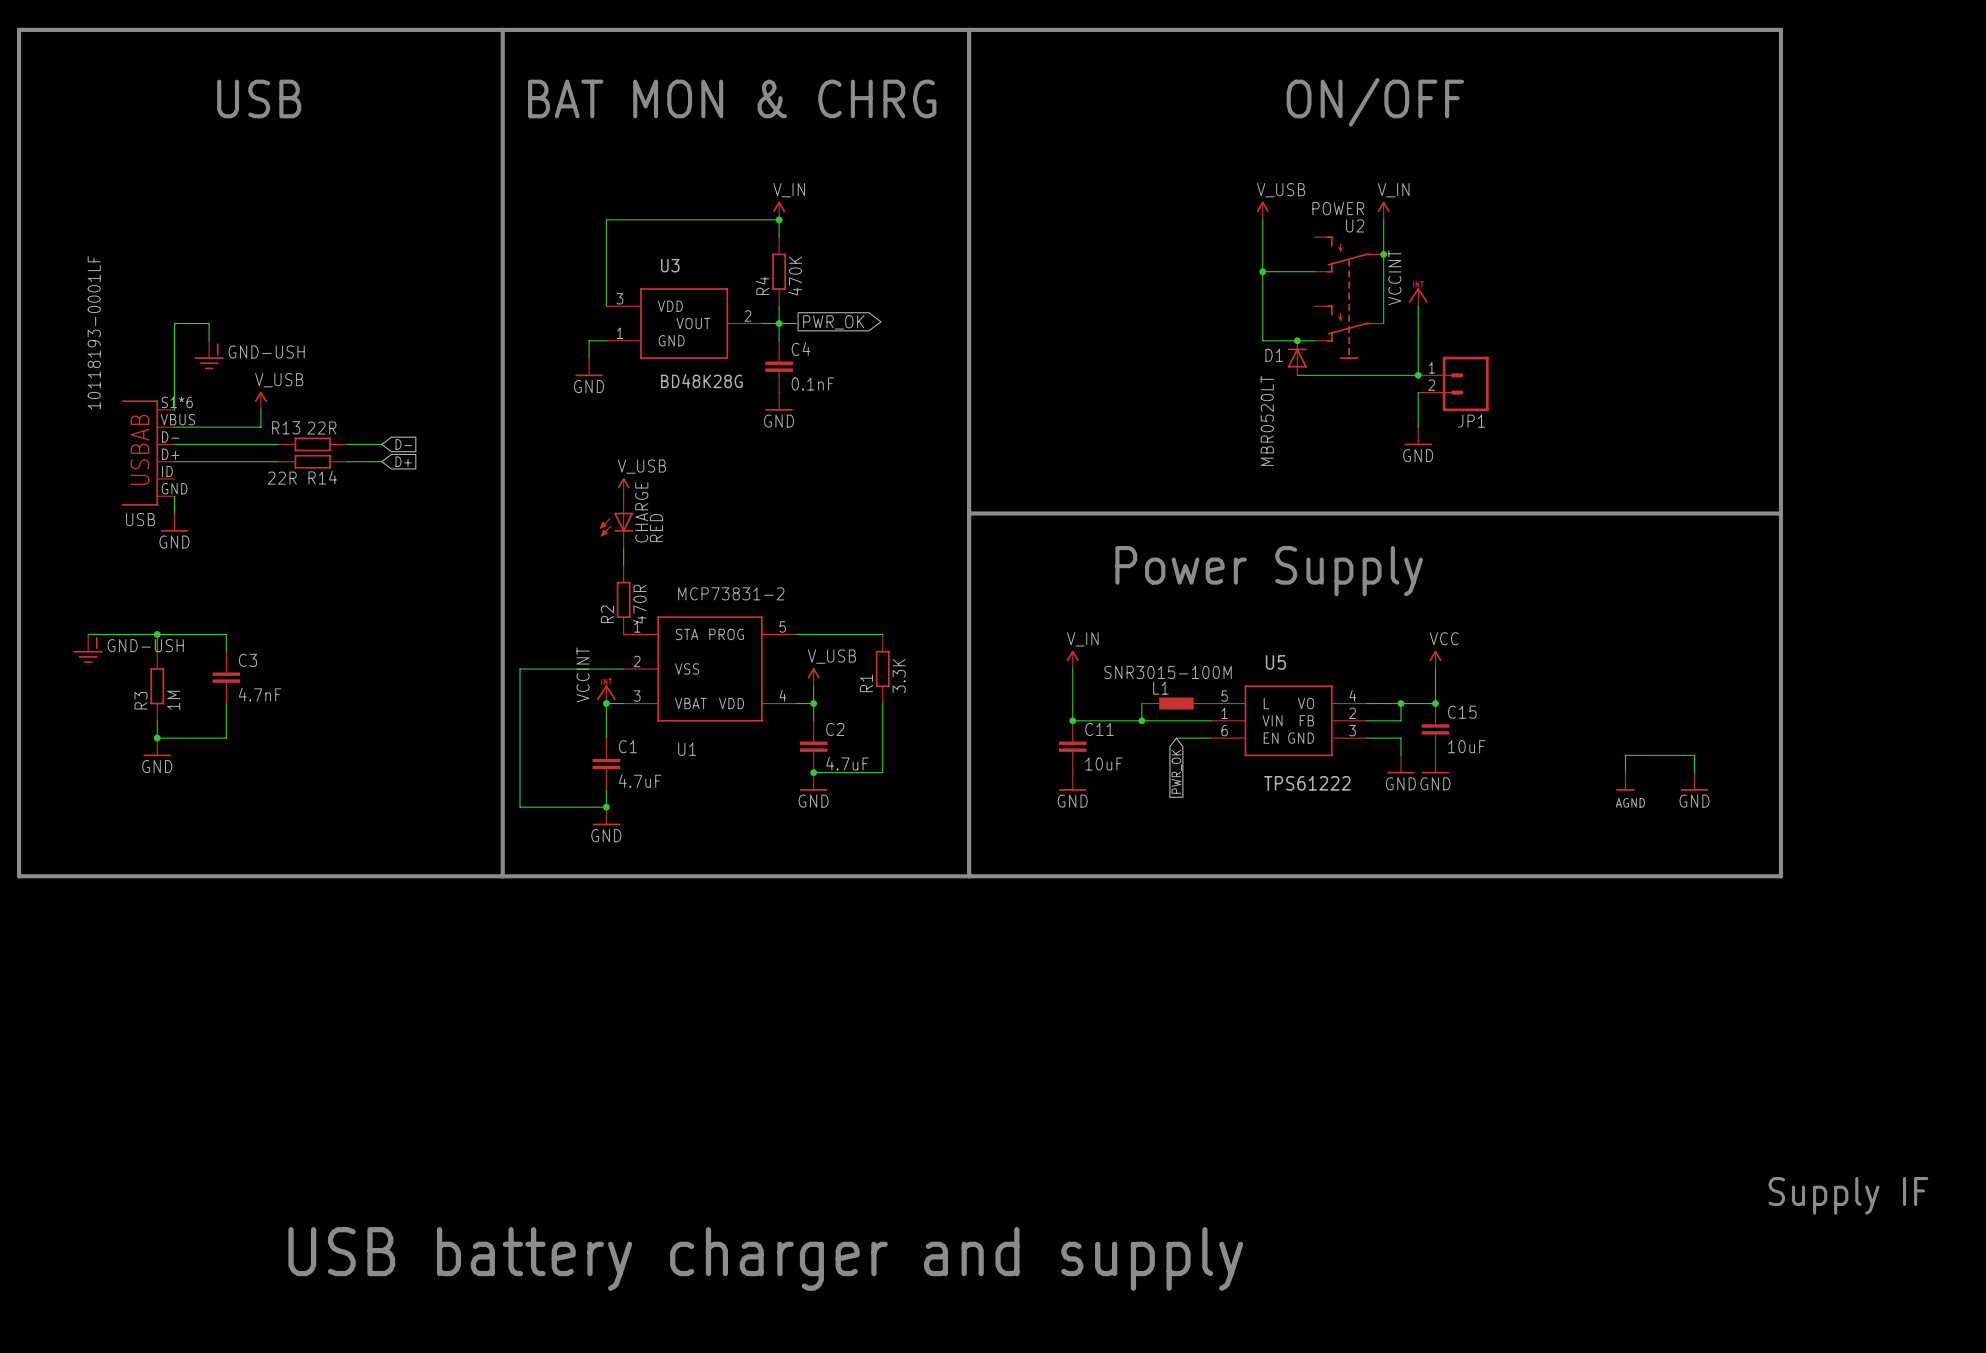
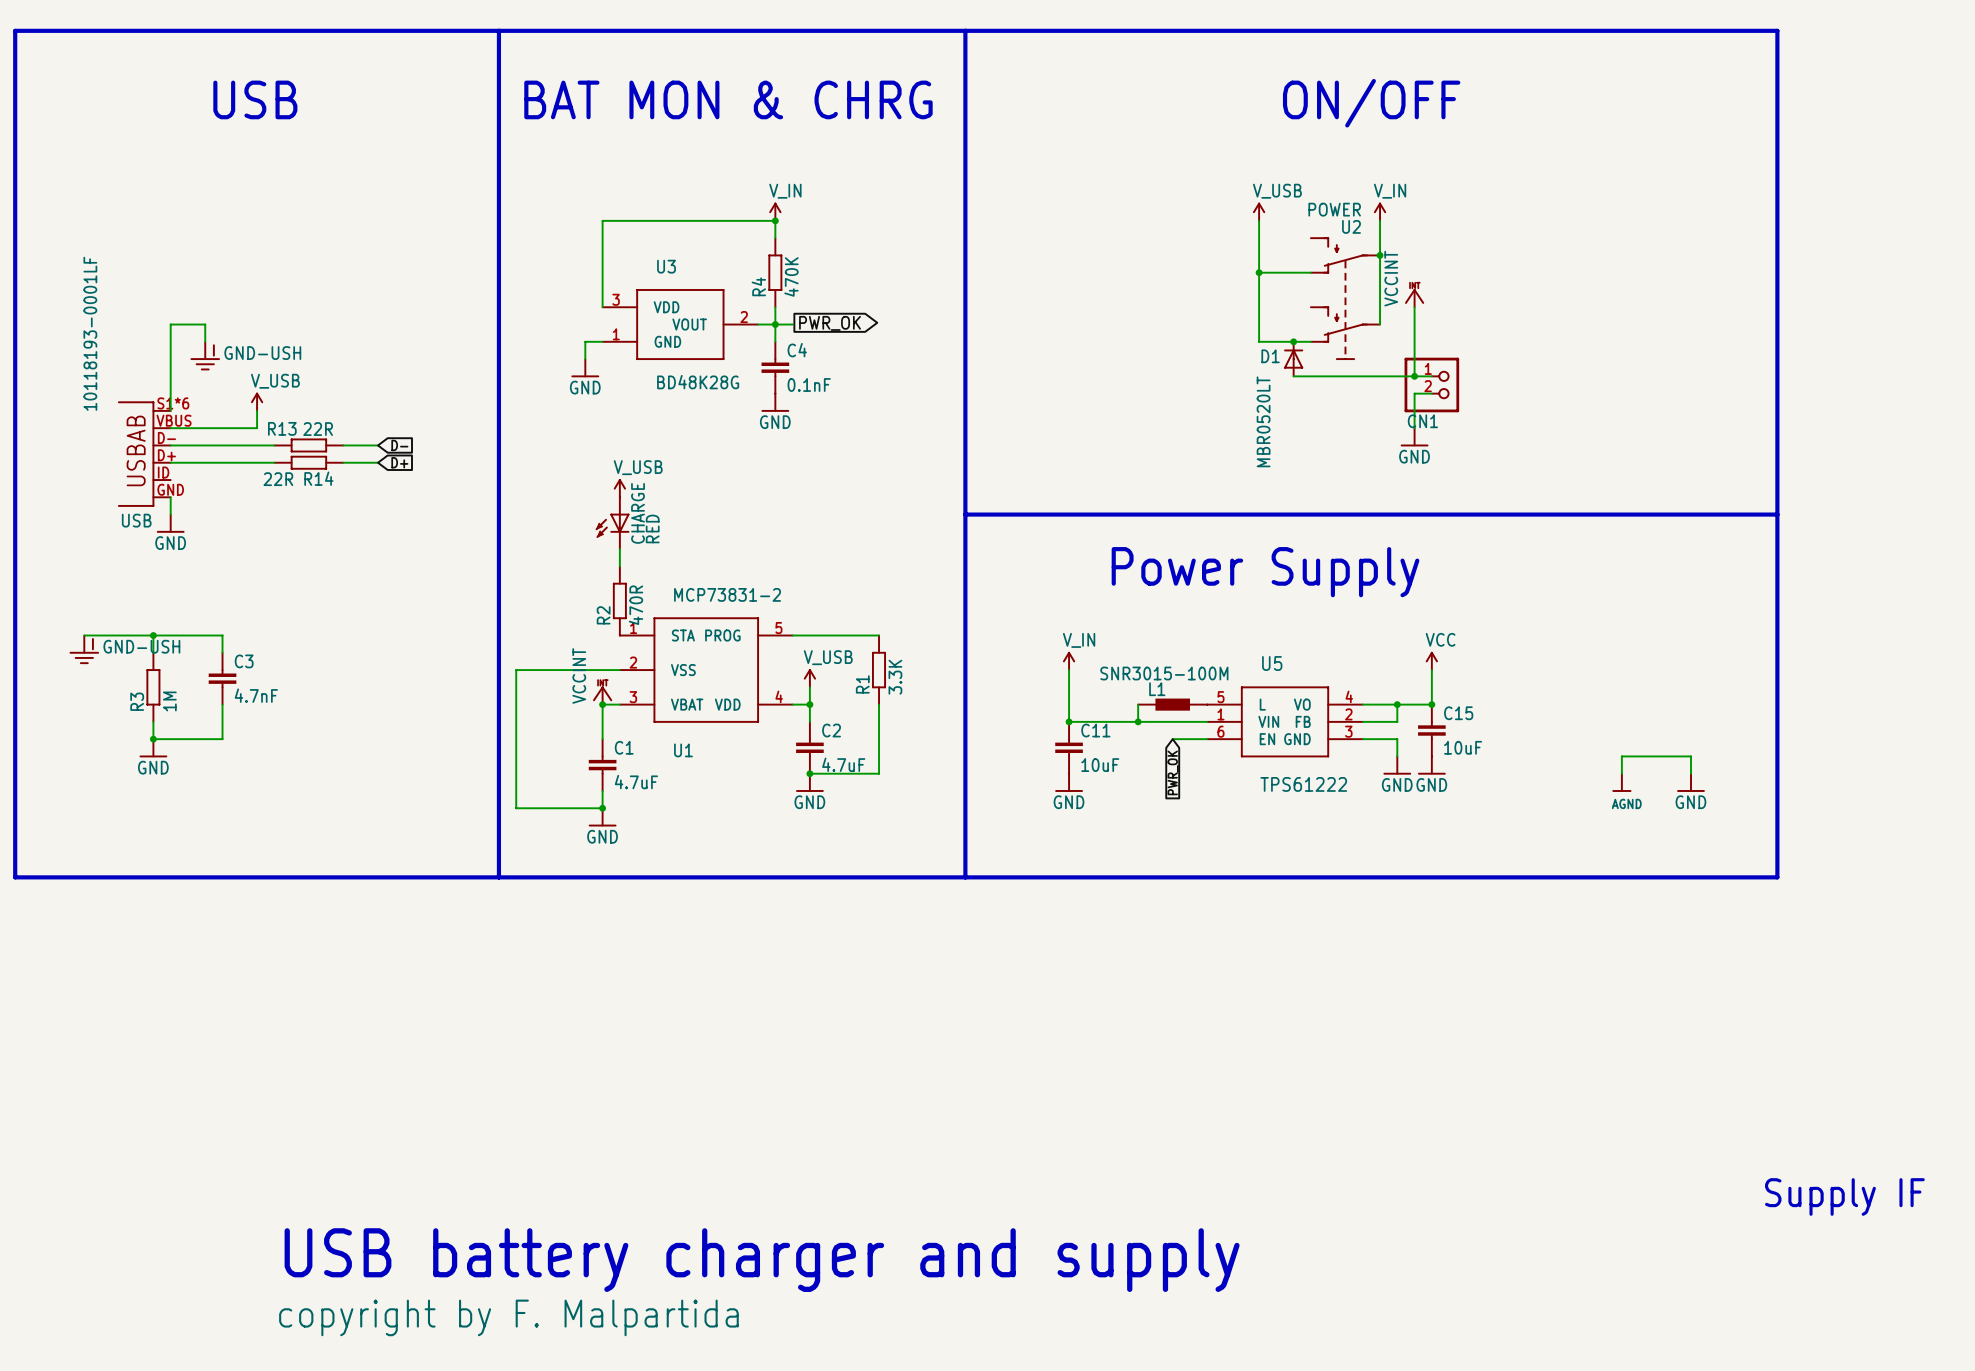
CN1: none -> (1431, 384)
JP1: (1453, 383) -> none
text: none -> copyright by F. Malpartida (508, 1317)

